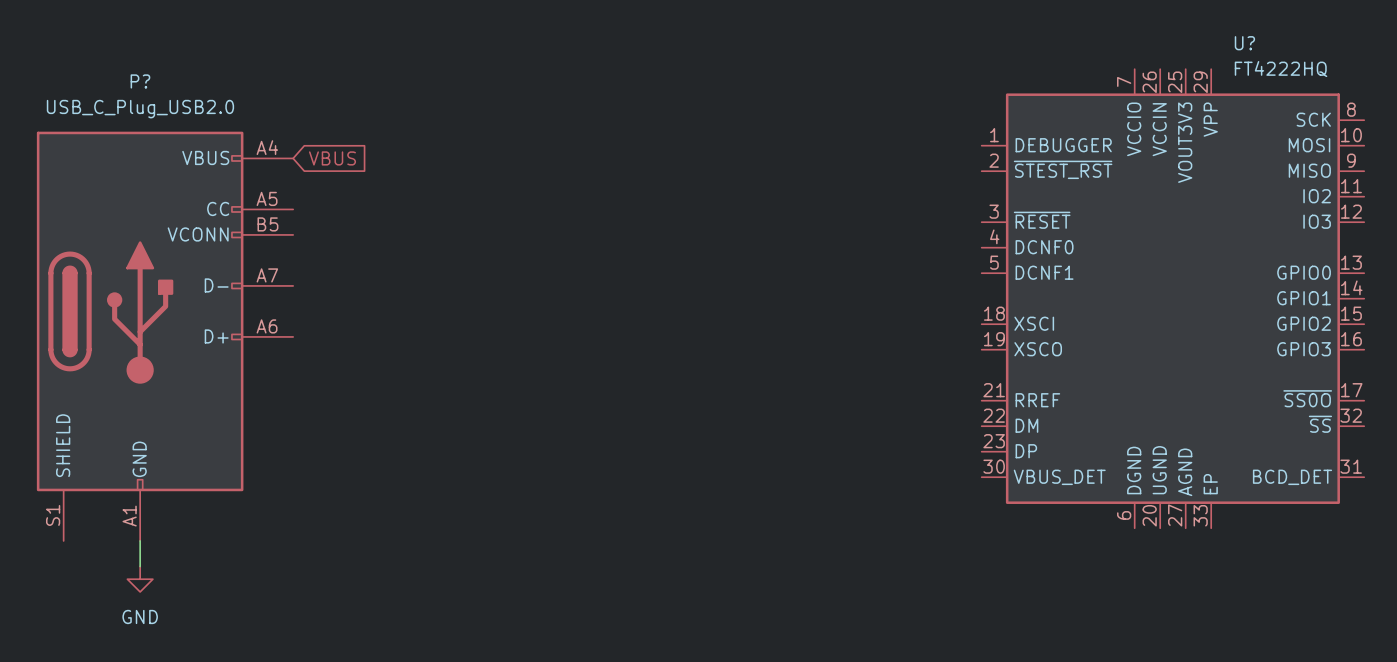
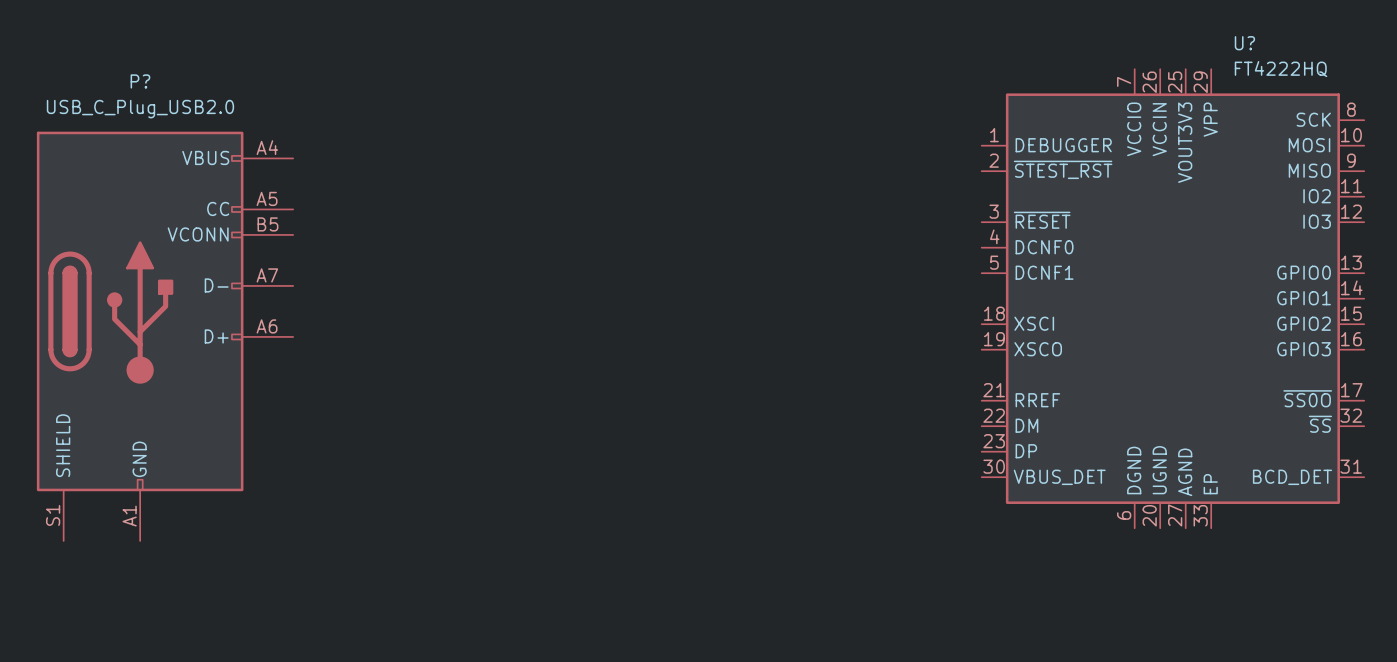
global label: VBUS (332, 158) -> none
wire: (140, 540) (140, 566) -> none
power symbol: GND (140, 579) -> none

